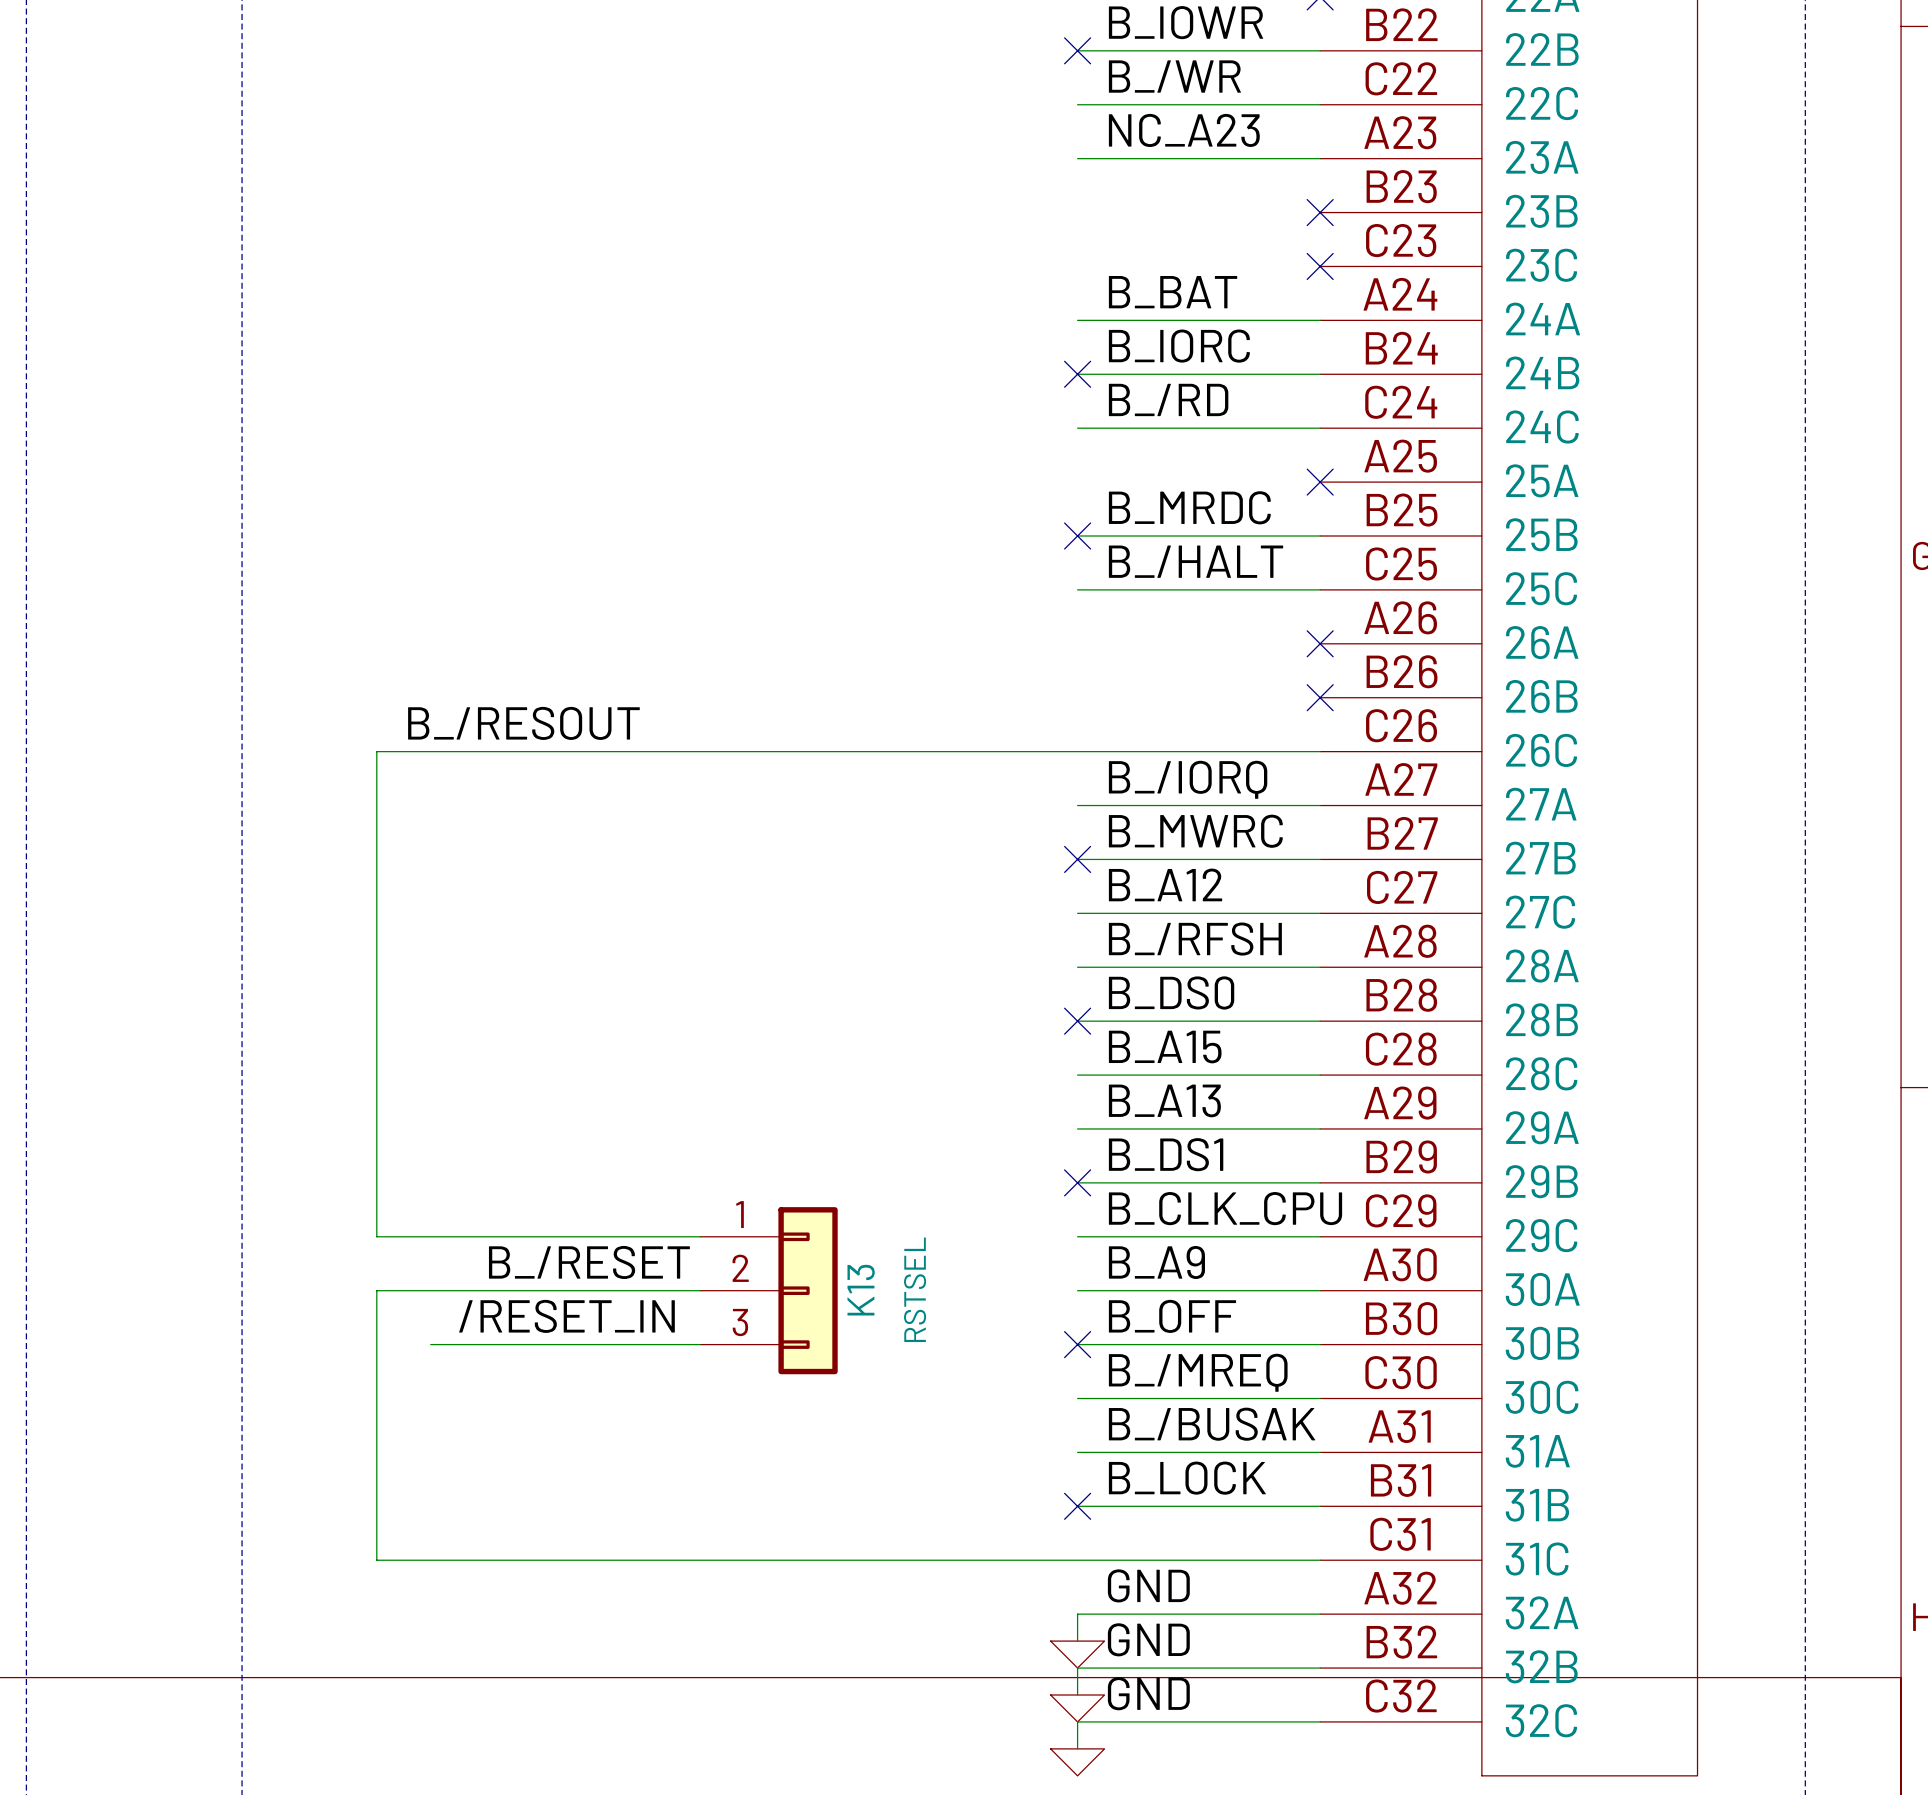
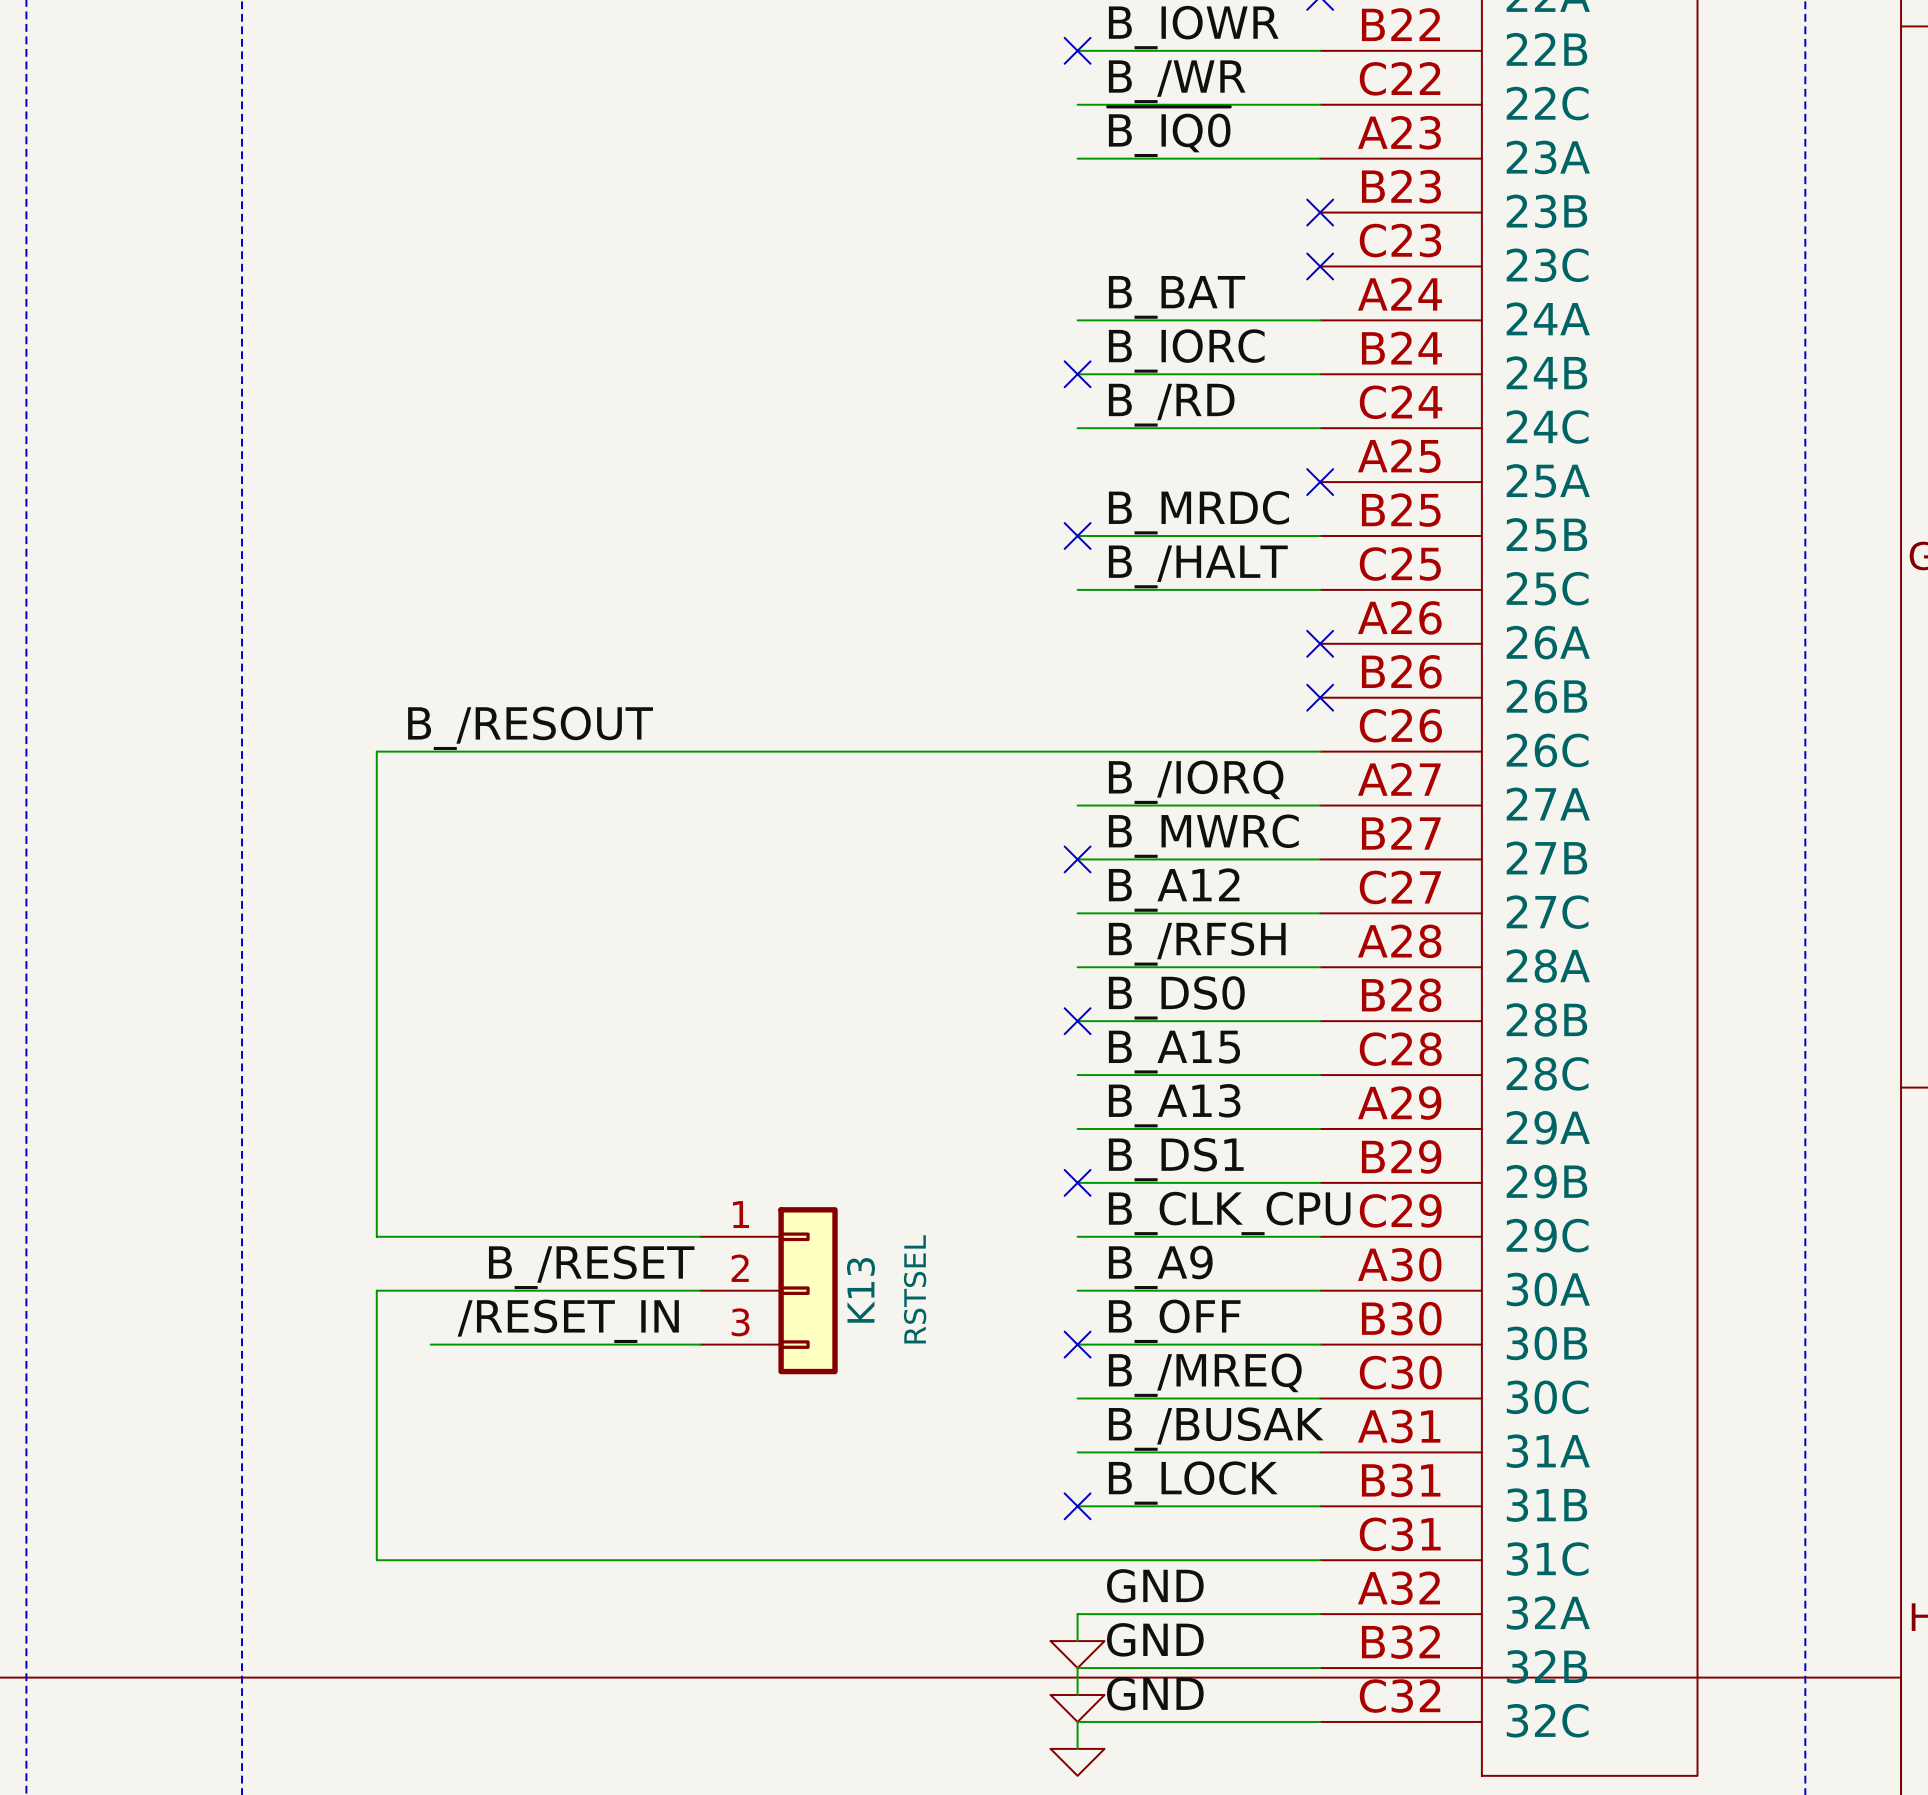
label: NC_A23 (1184, 130) -> ~{B_IQ0} (1169, 131)

